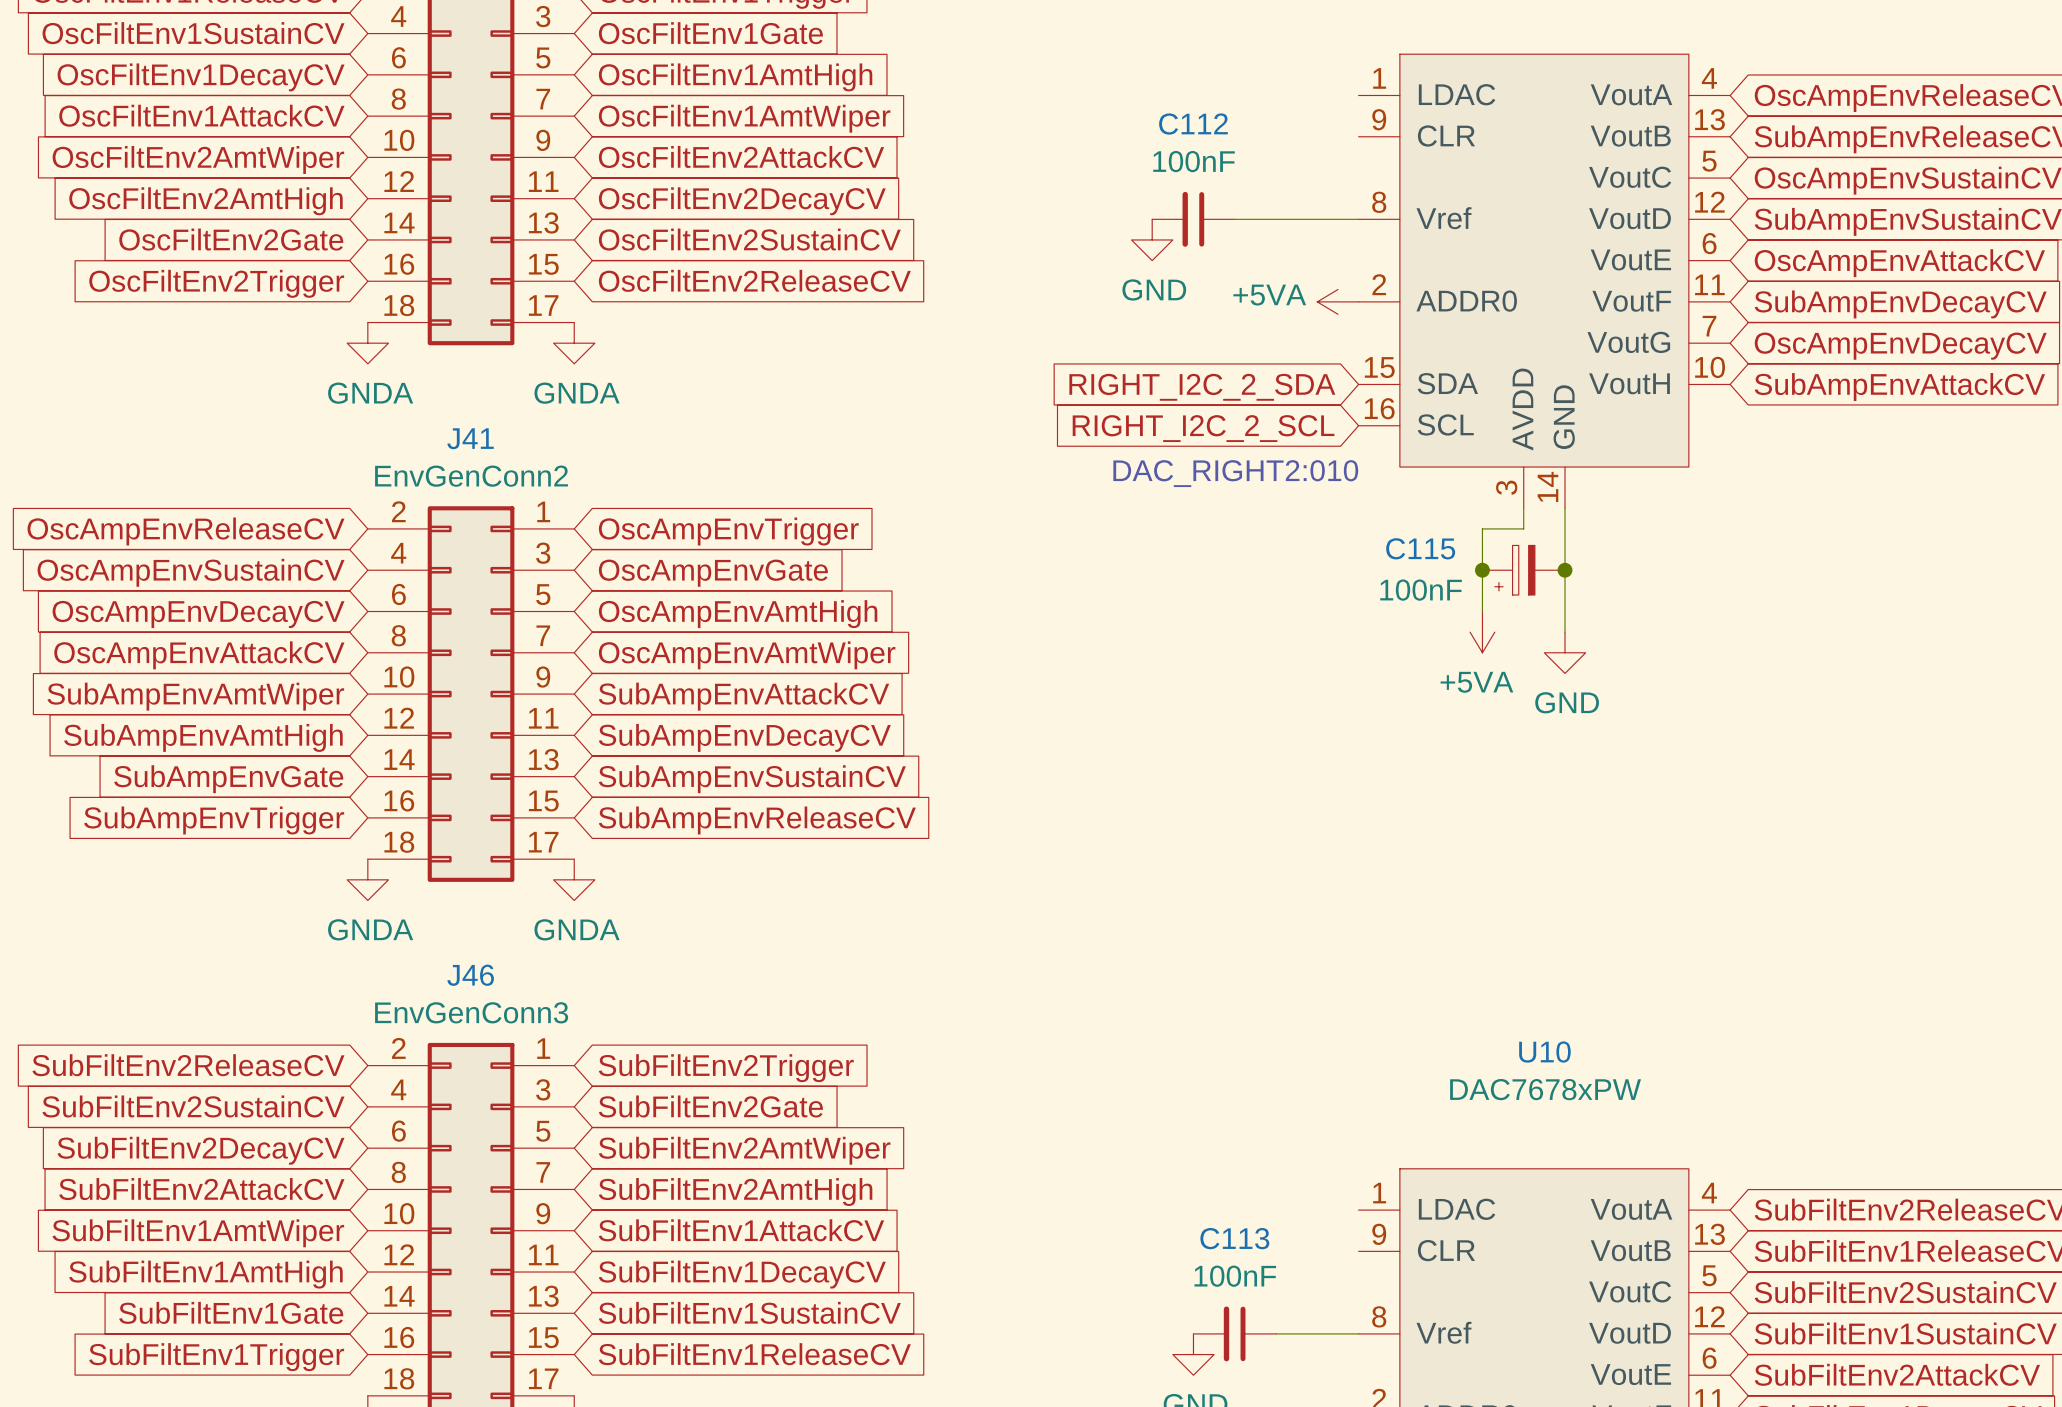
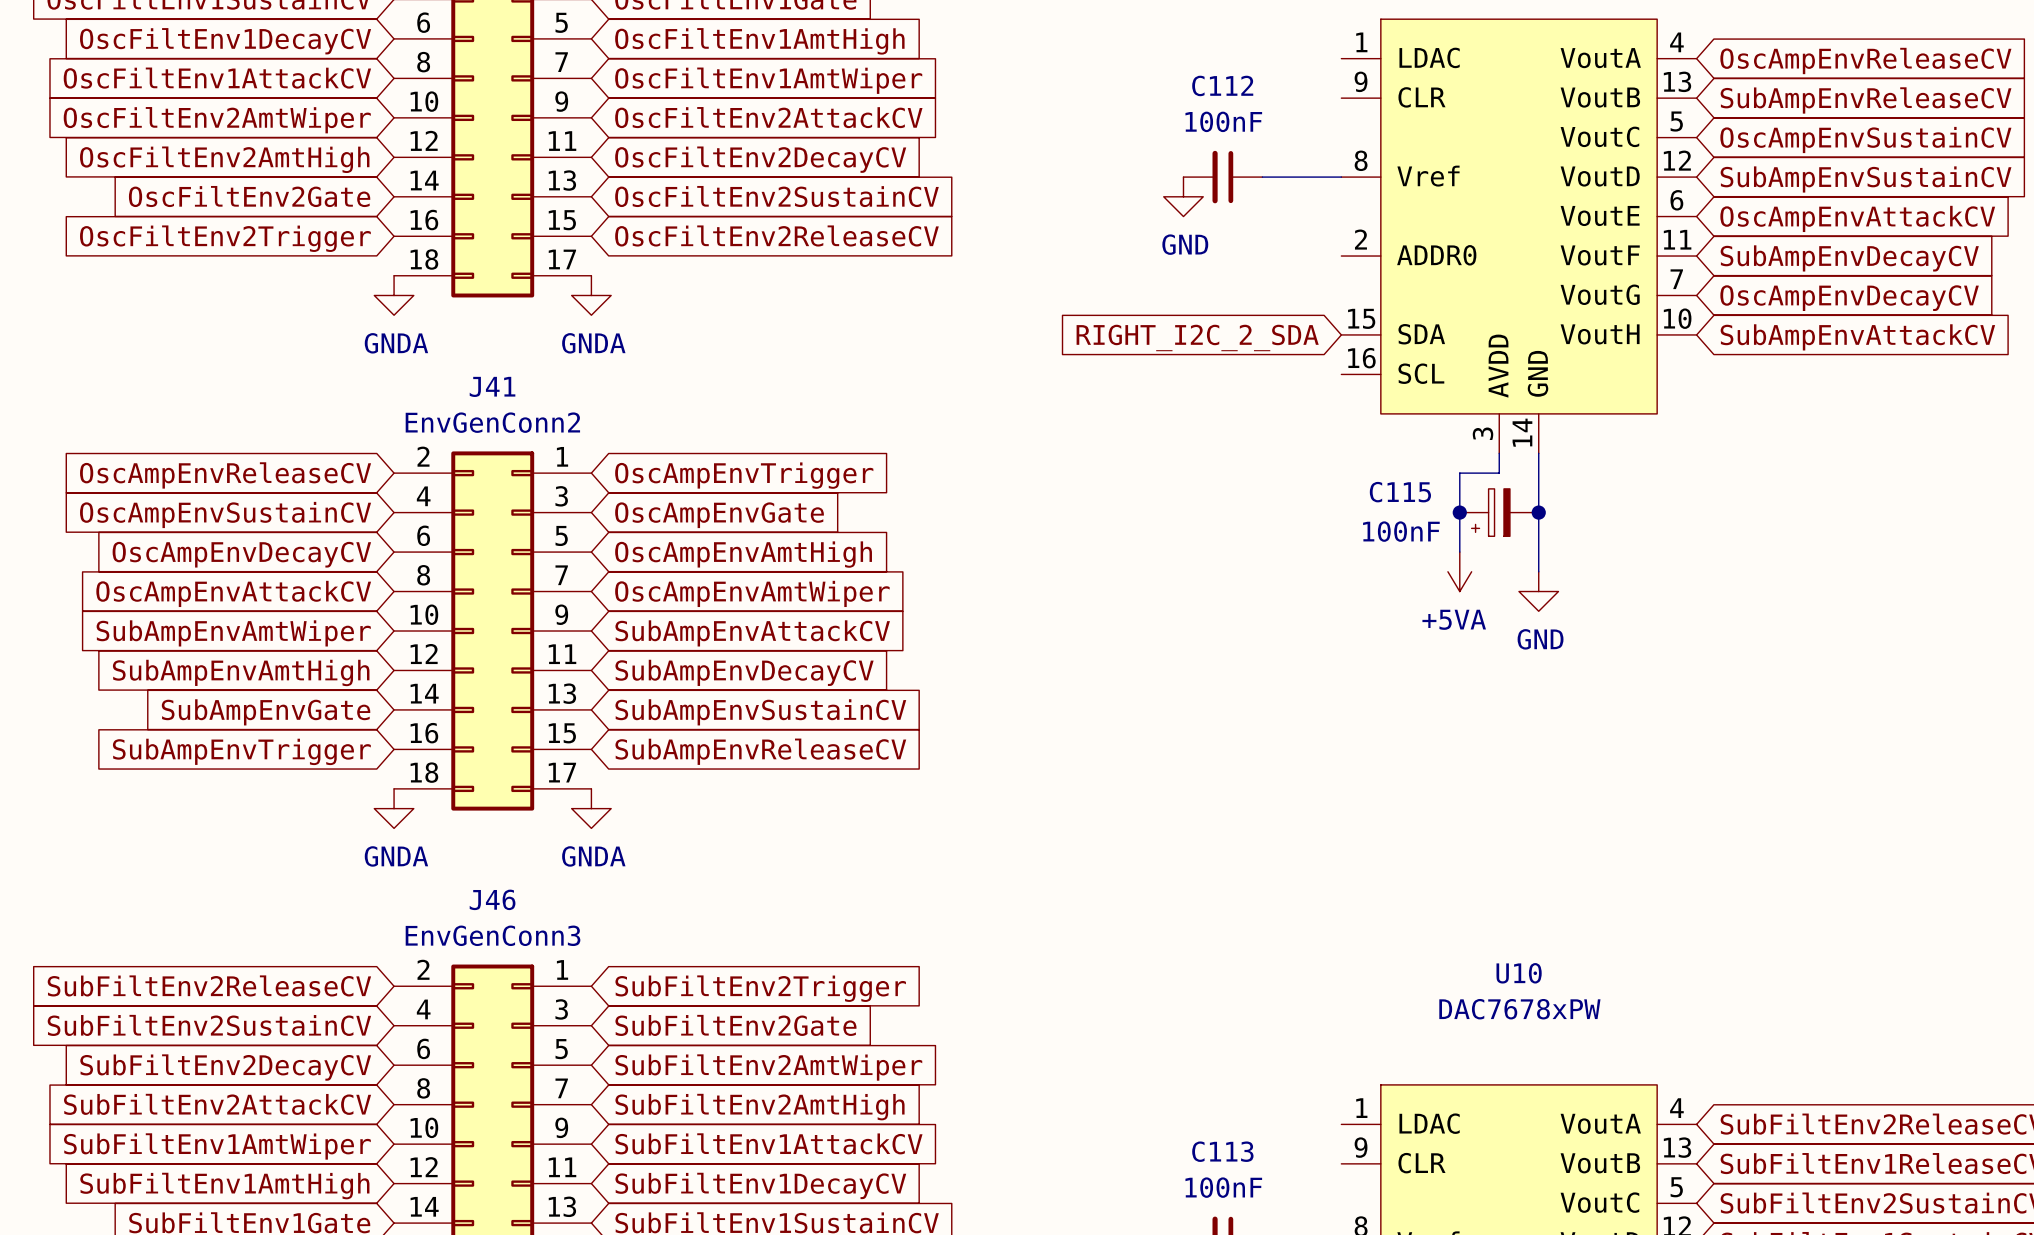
C112 position: (1193, 219) -> (1222, 177)
power symbol position: GND (1152, 239) -> GND (1183, 196)
power symbol: +5VA (1337, 301) -> none
global label: RIGHT_I2C_2_SCL (1203, 428) -> none
text: DAC_RIGHT2:010 (1235, 473) -> none

